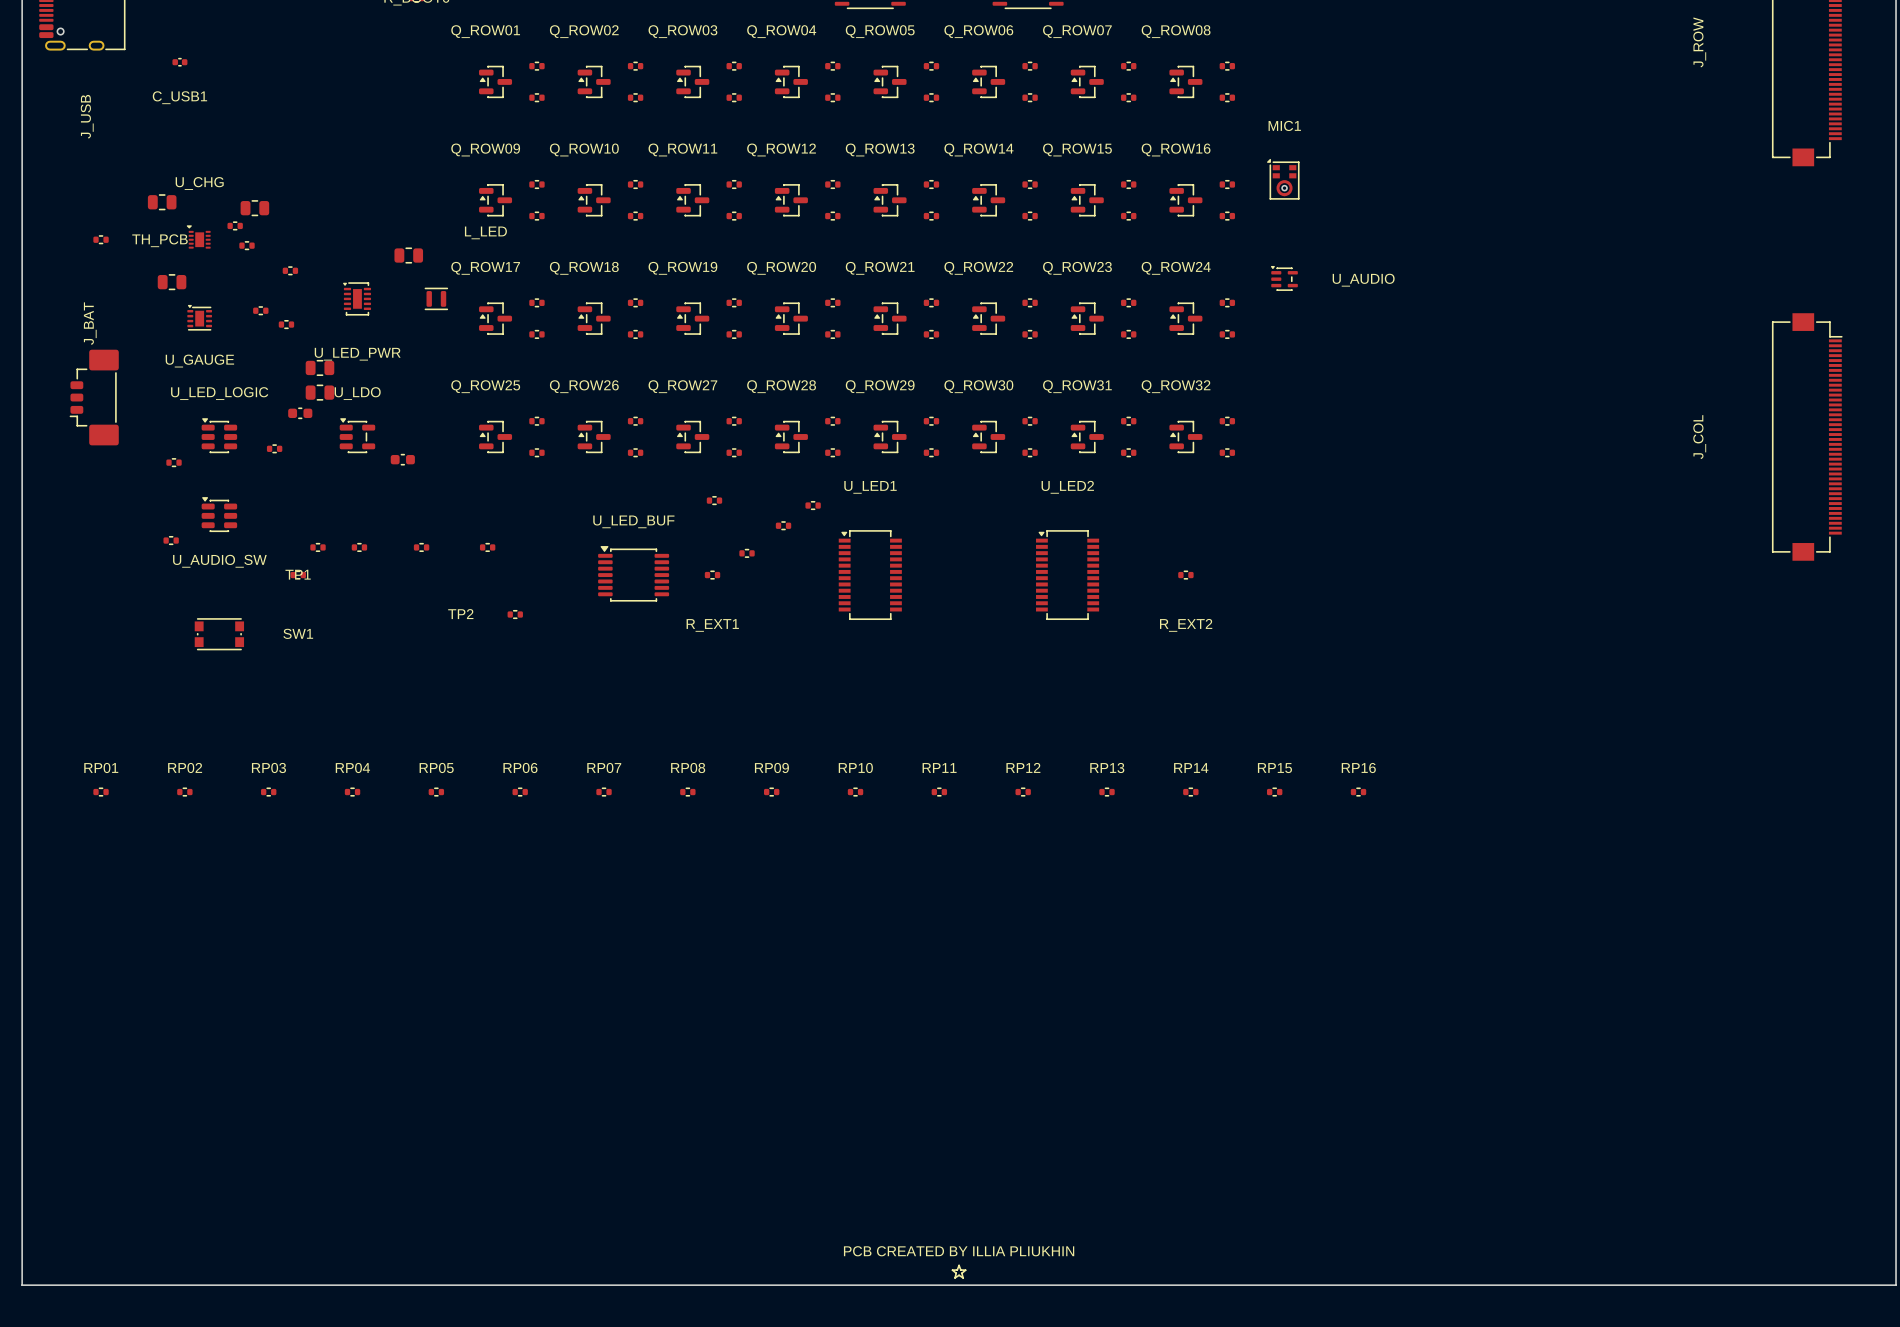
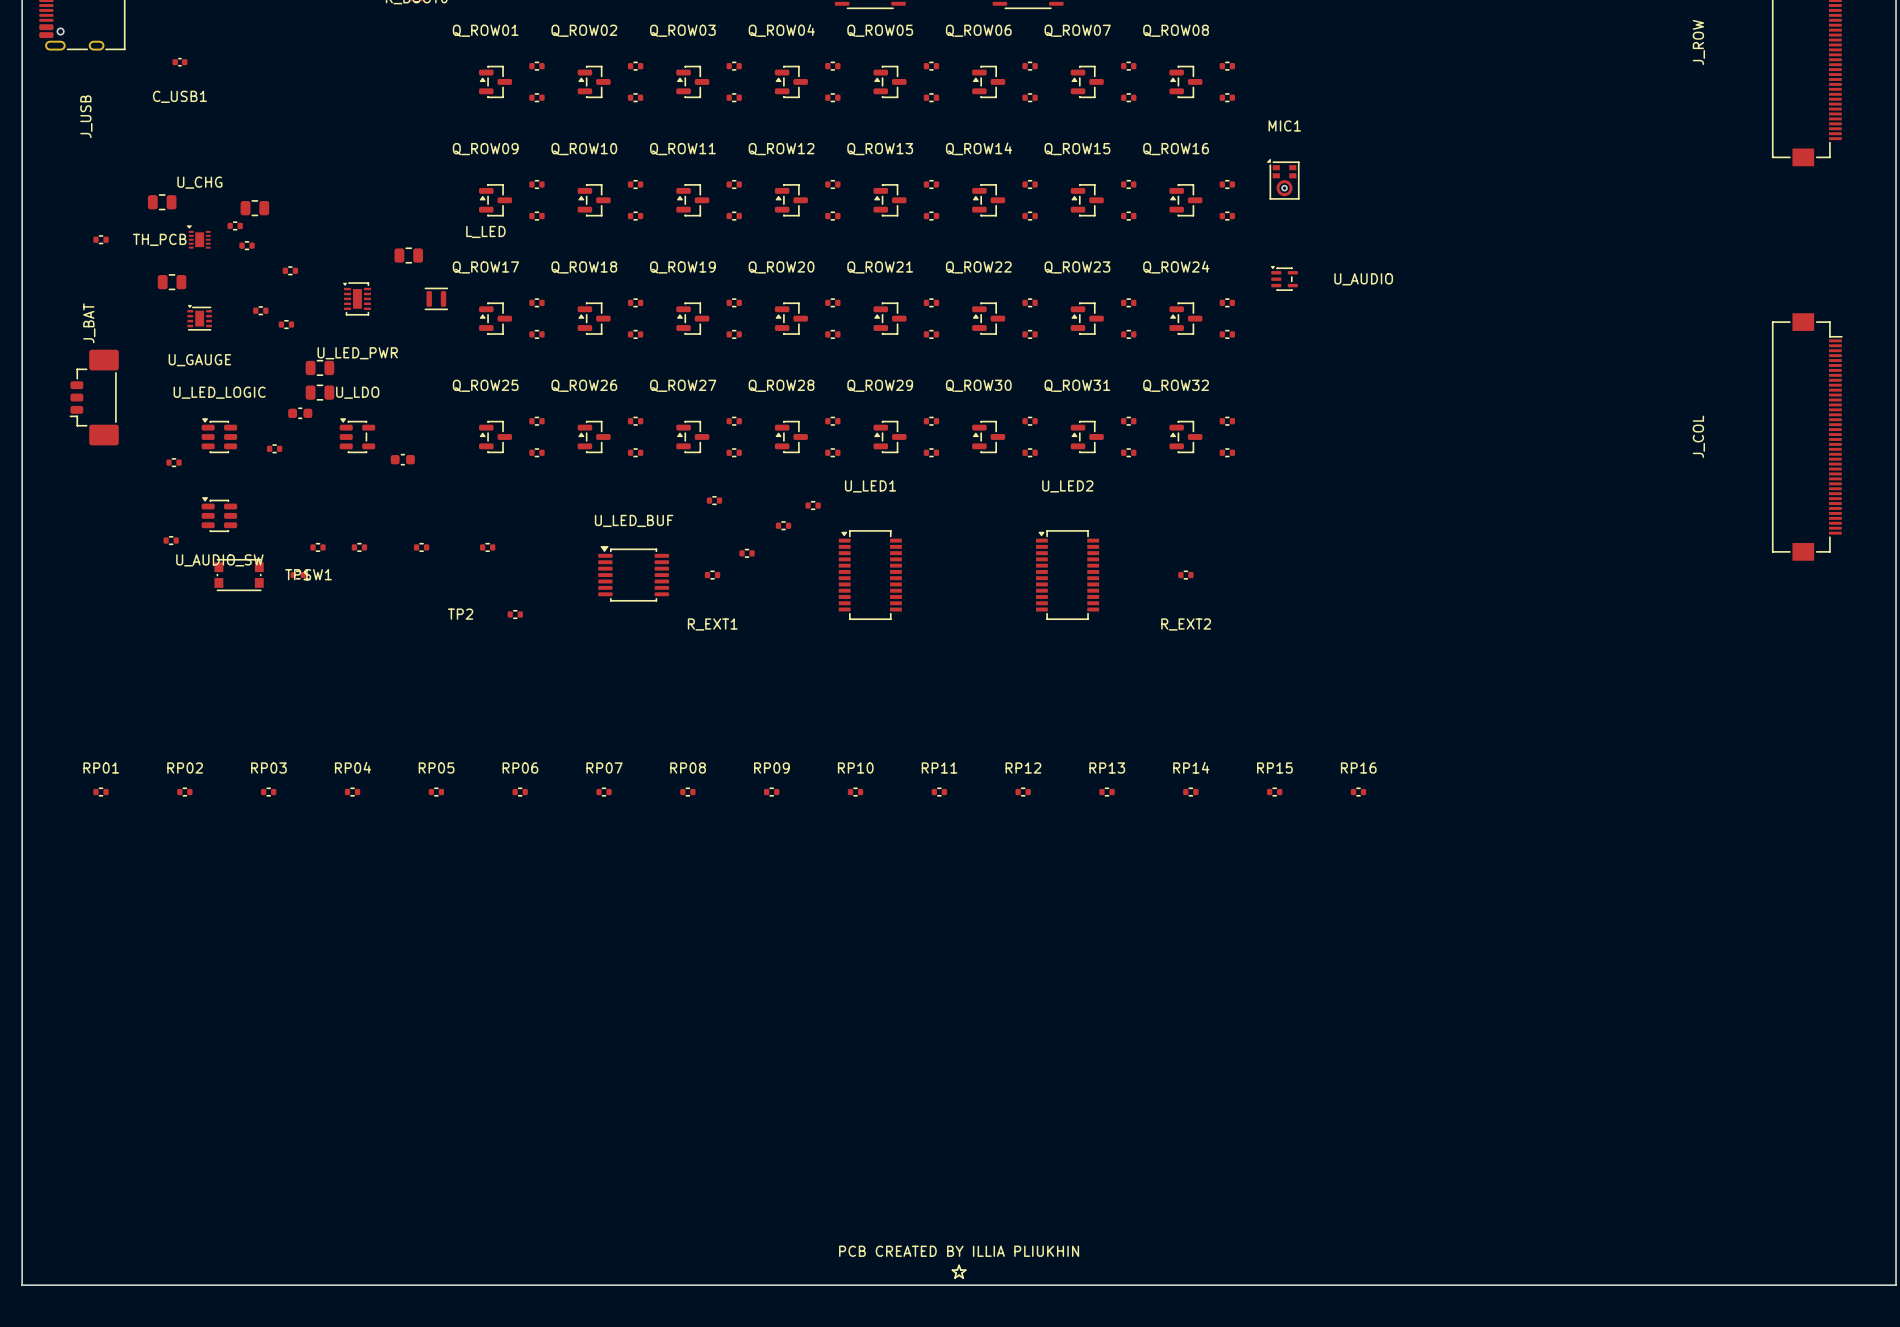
SW1 position: (219, 634) -> (239, 575)

